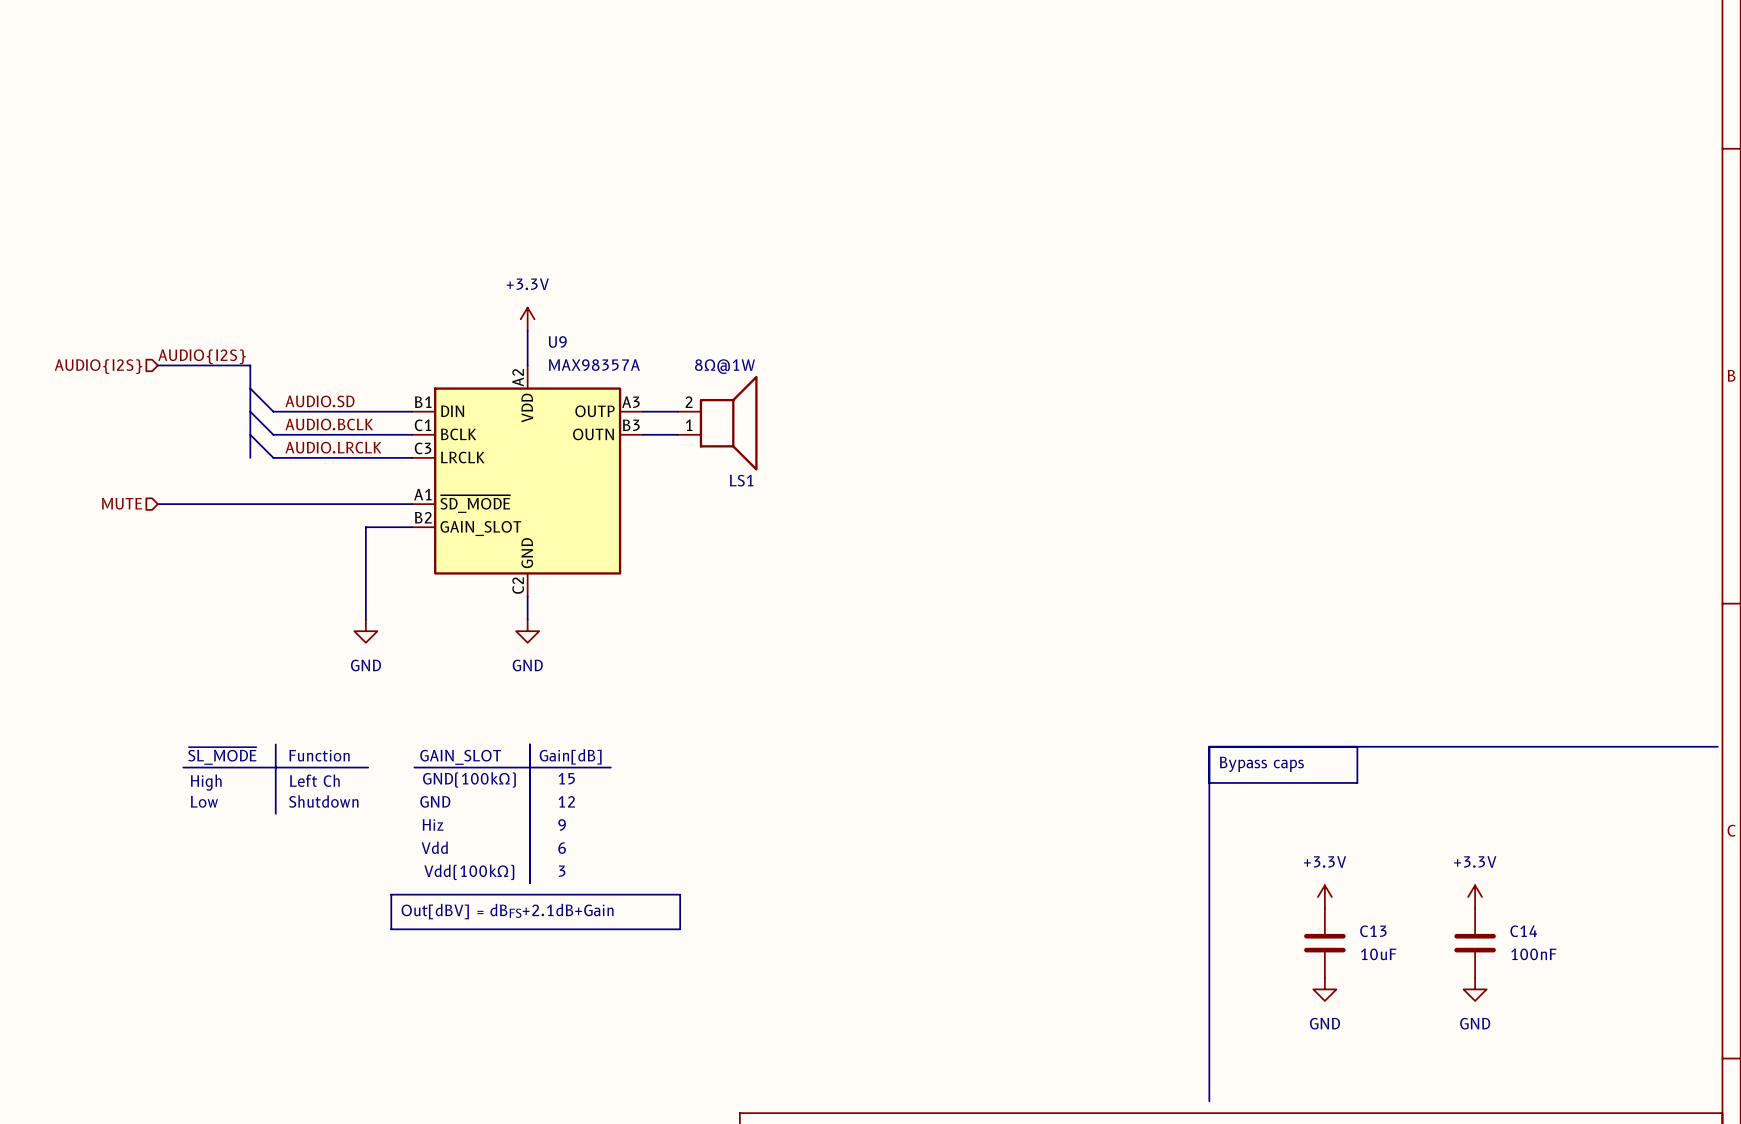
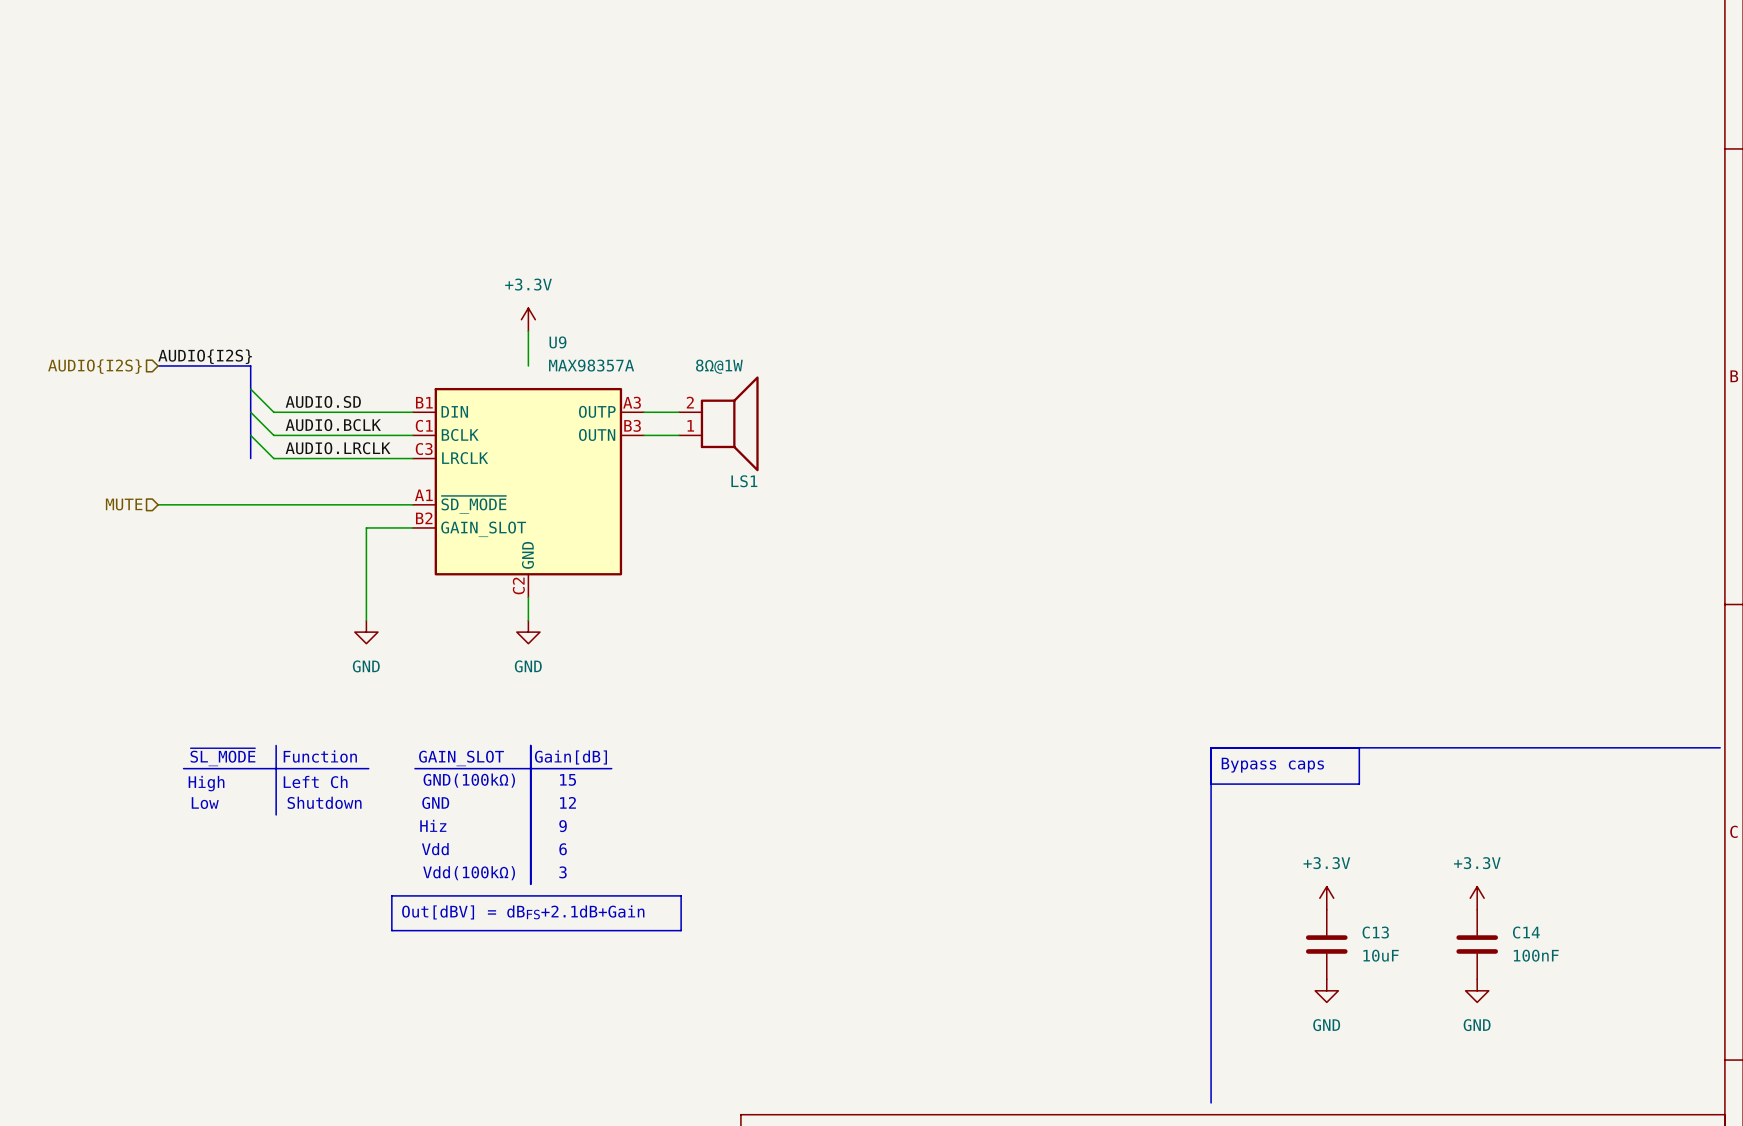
U9 symbol: [412, 365, 644, 597] -> [412, 387, 645, 598]

